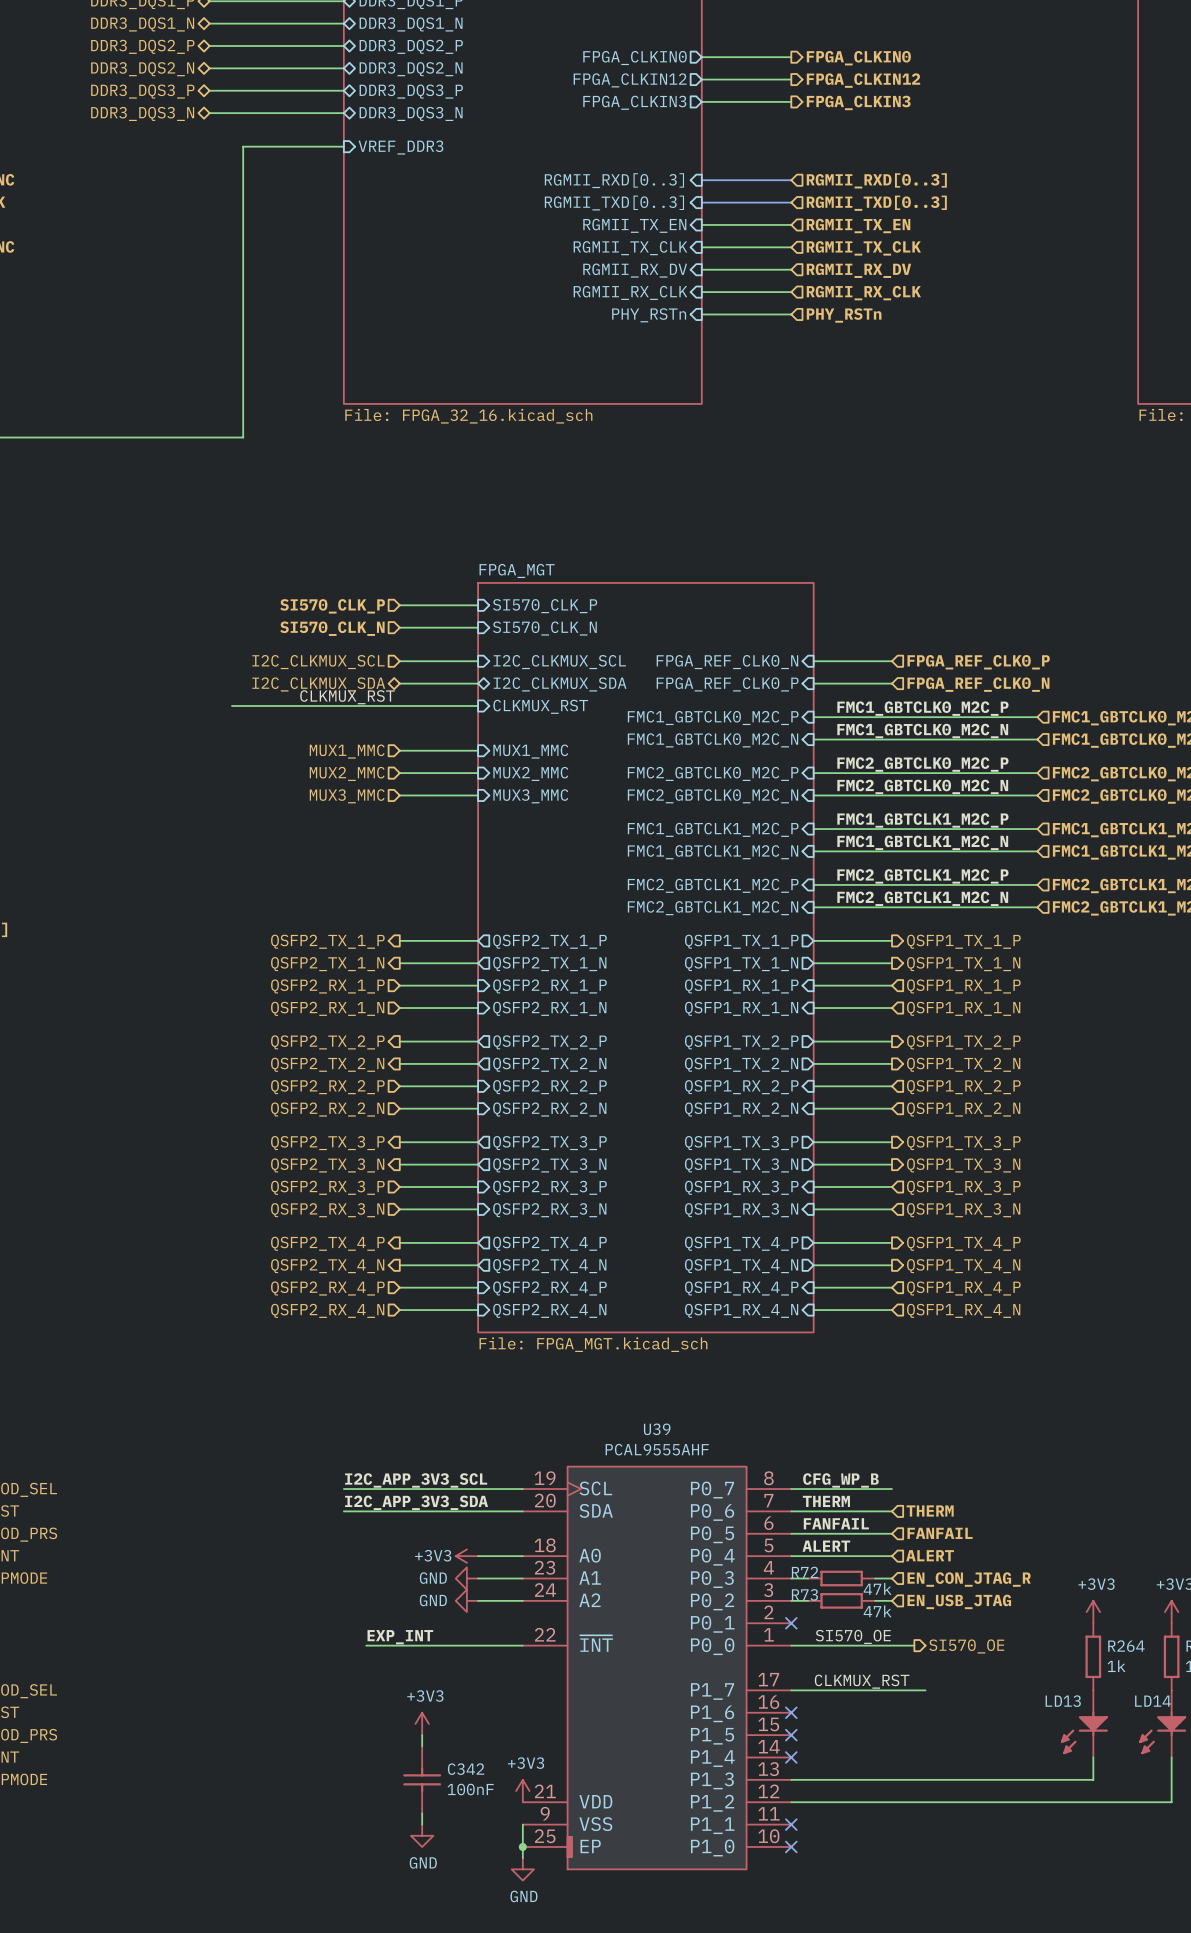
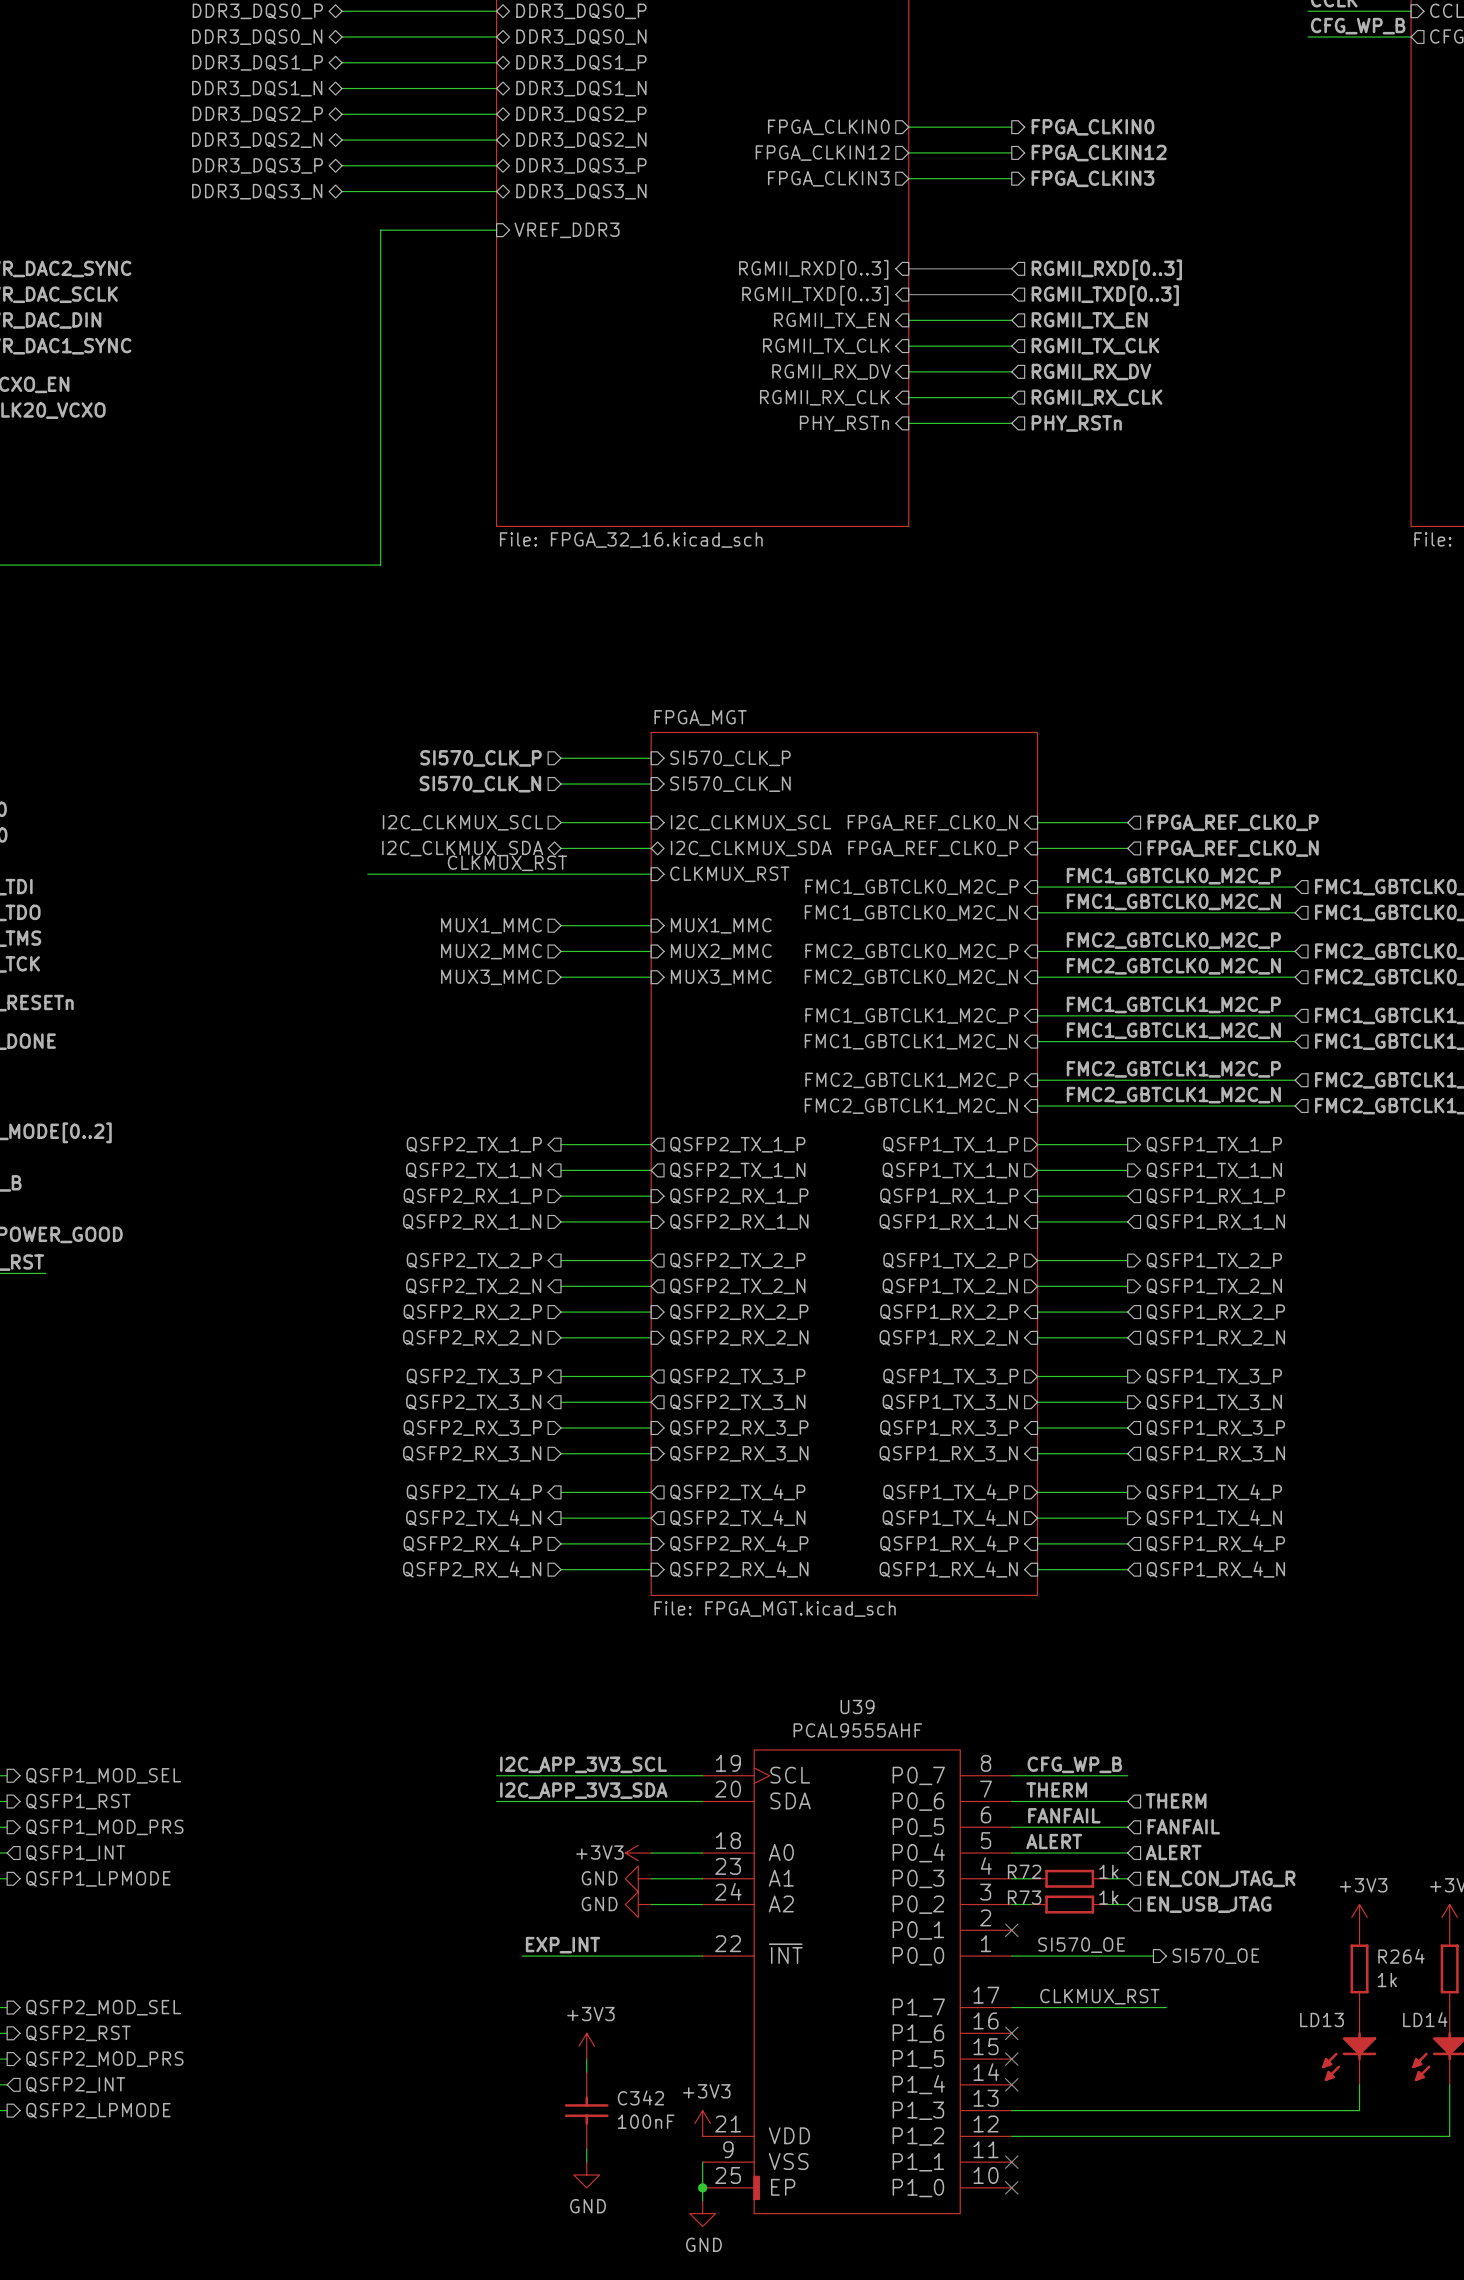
R72 text: 47k (877, 1588) -> 1k (1108, 1897)
R73 text: 47k (877, 1611) -> 1k (1108, 1871)

